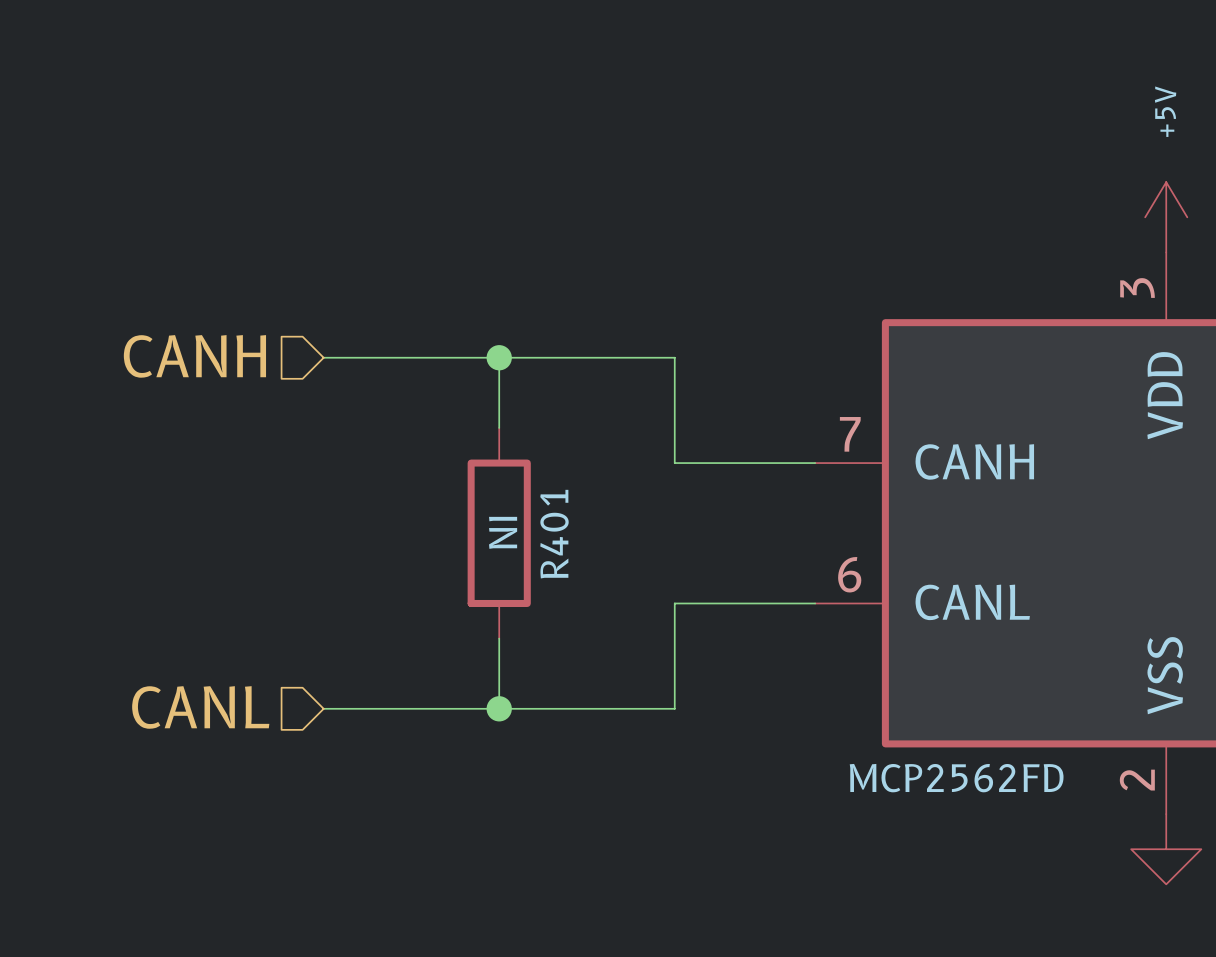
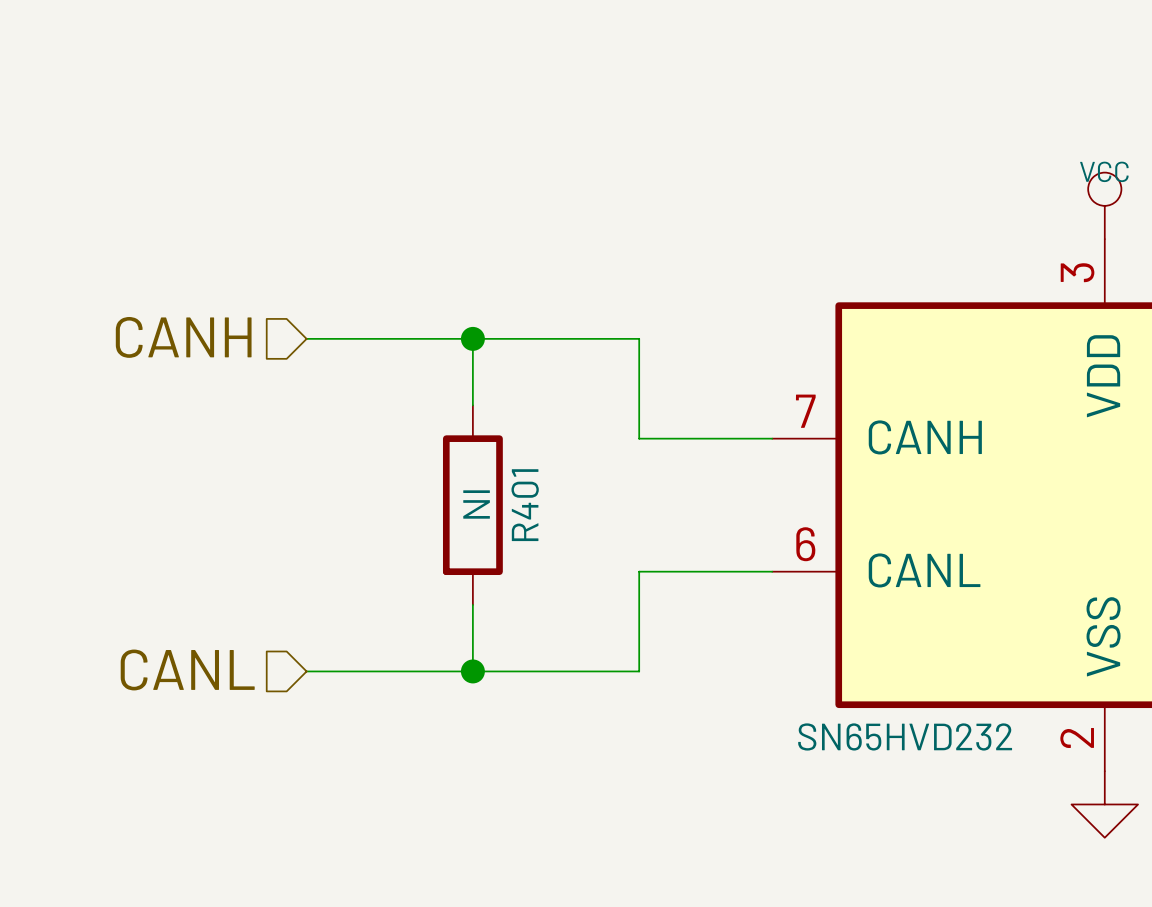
power symbol: +5V (1166, 217) -> VCC (1104, 205)
part value: MCP2562FD (956, 778) -> SN65HVD232 (905, 736)

